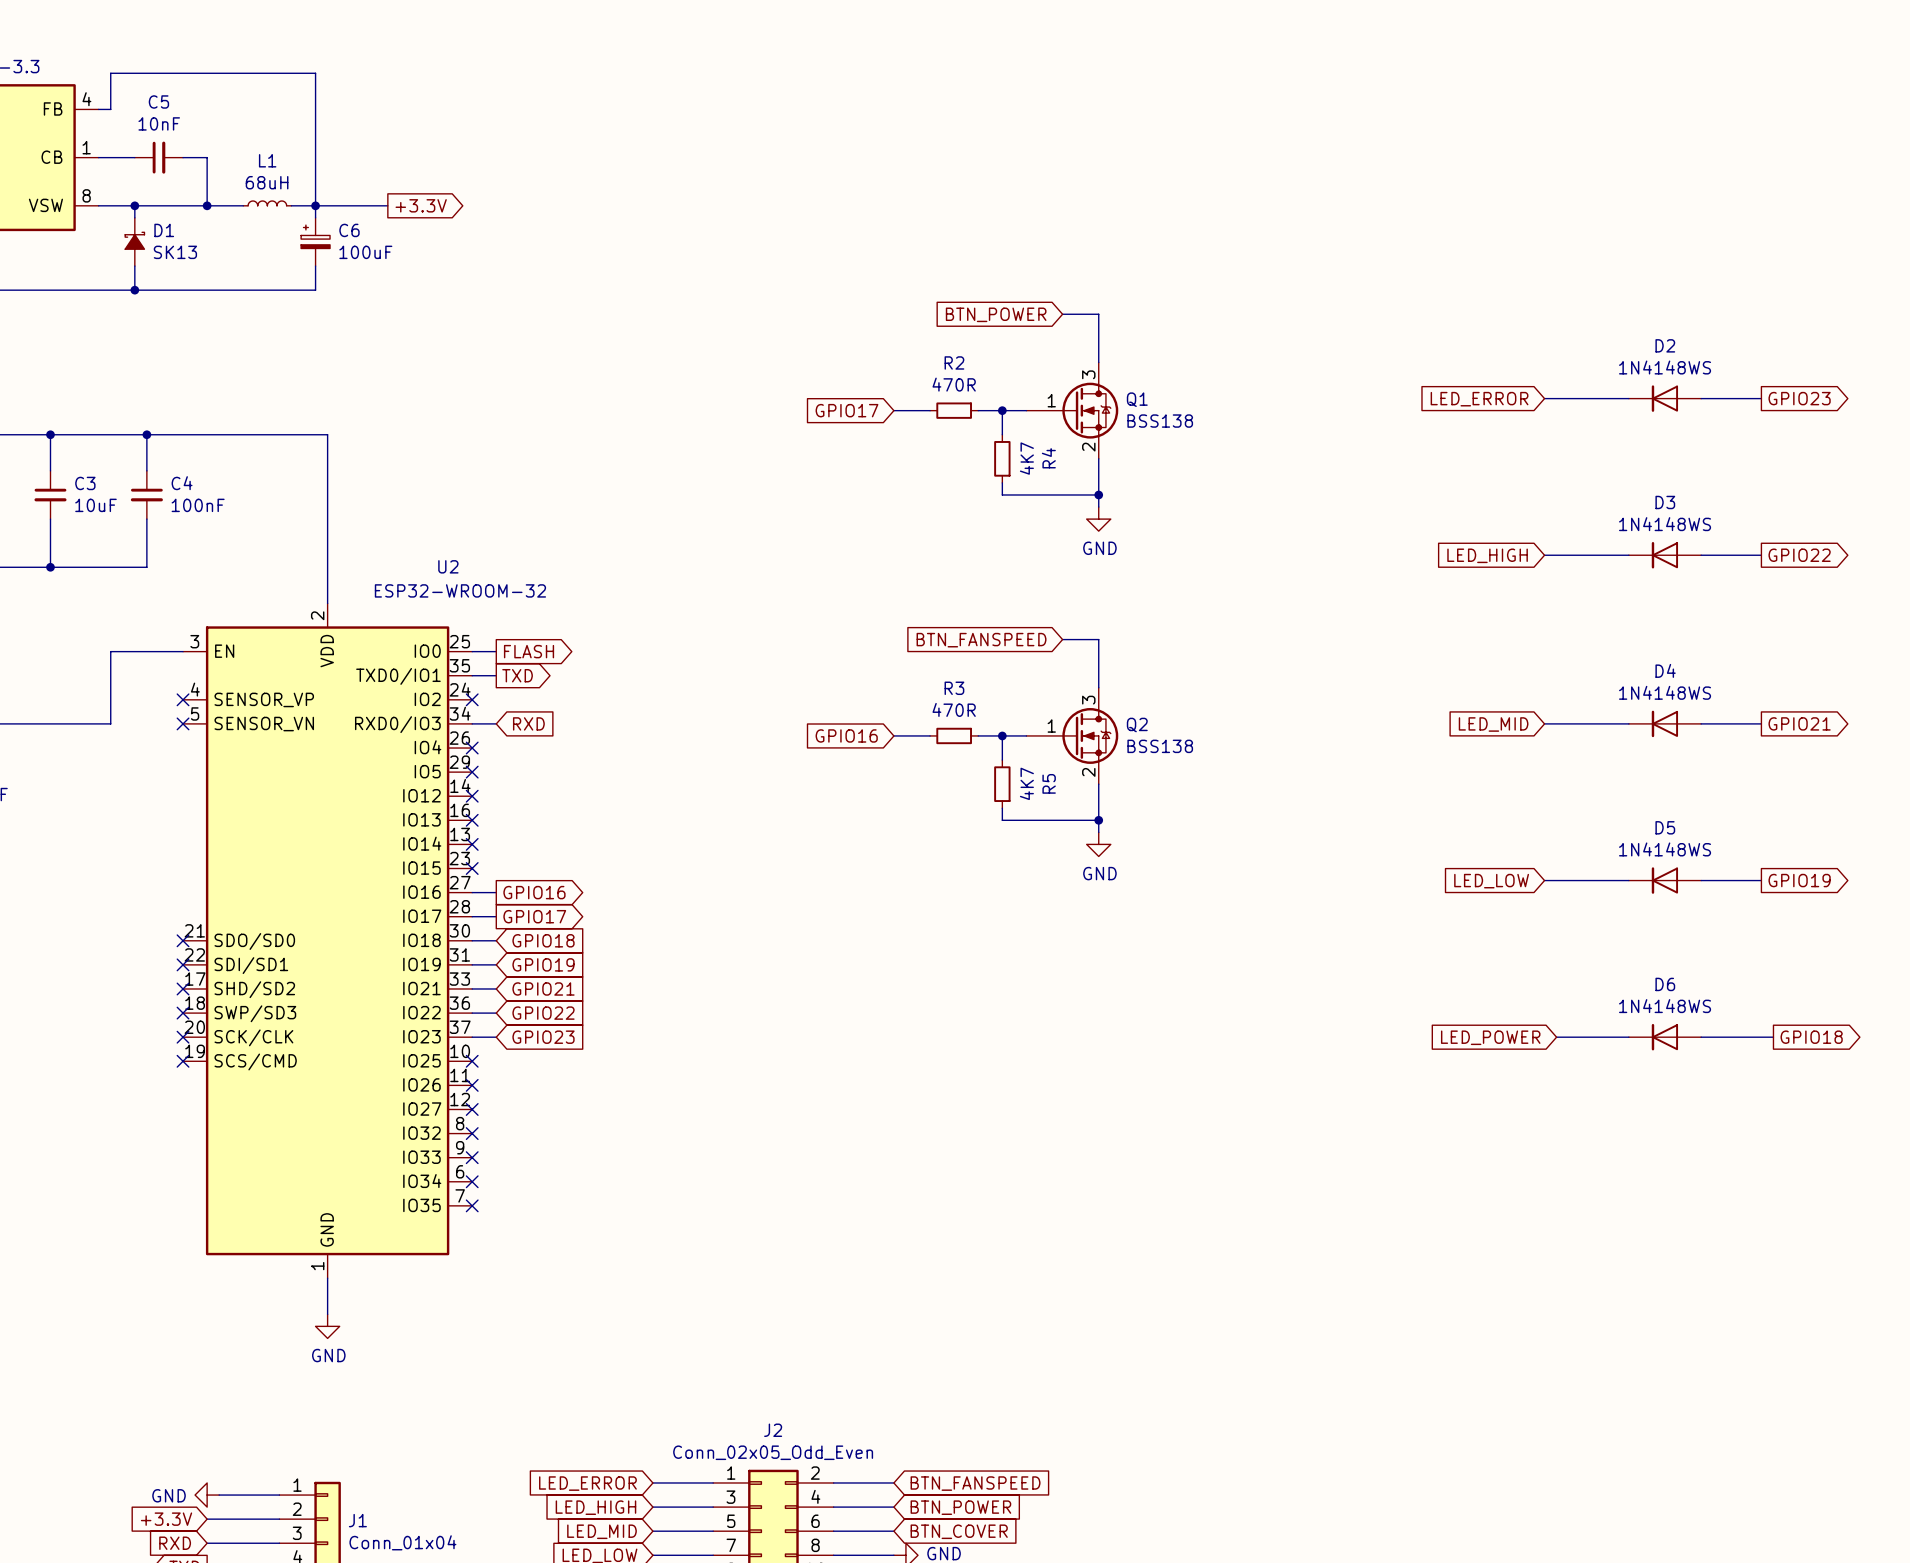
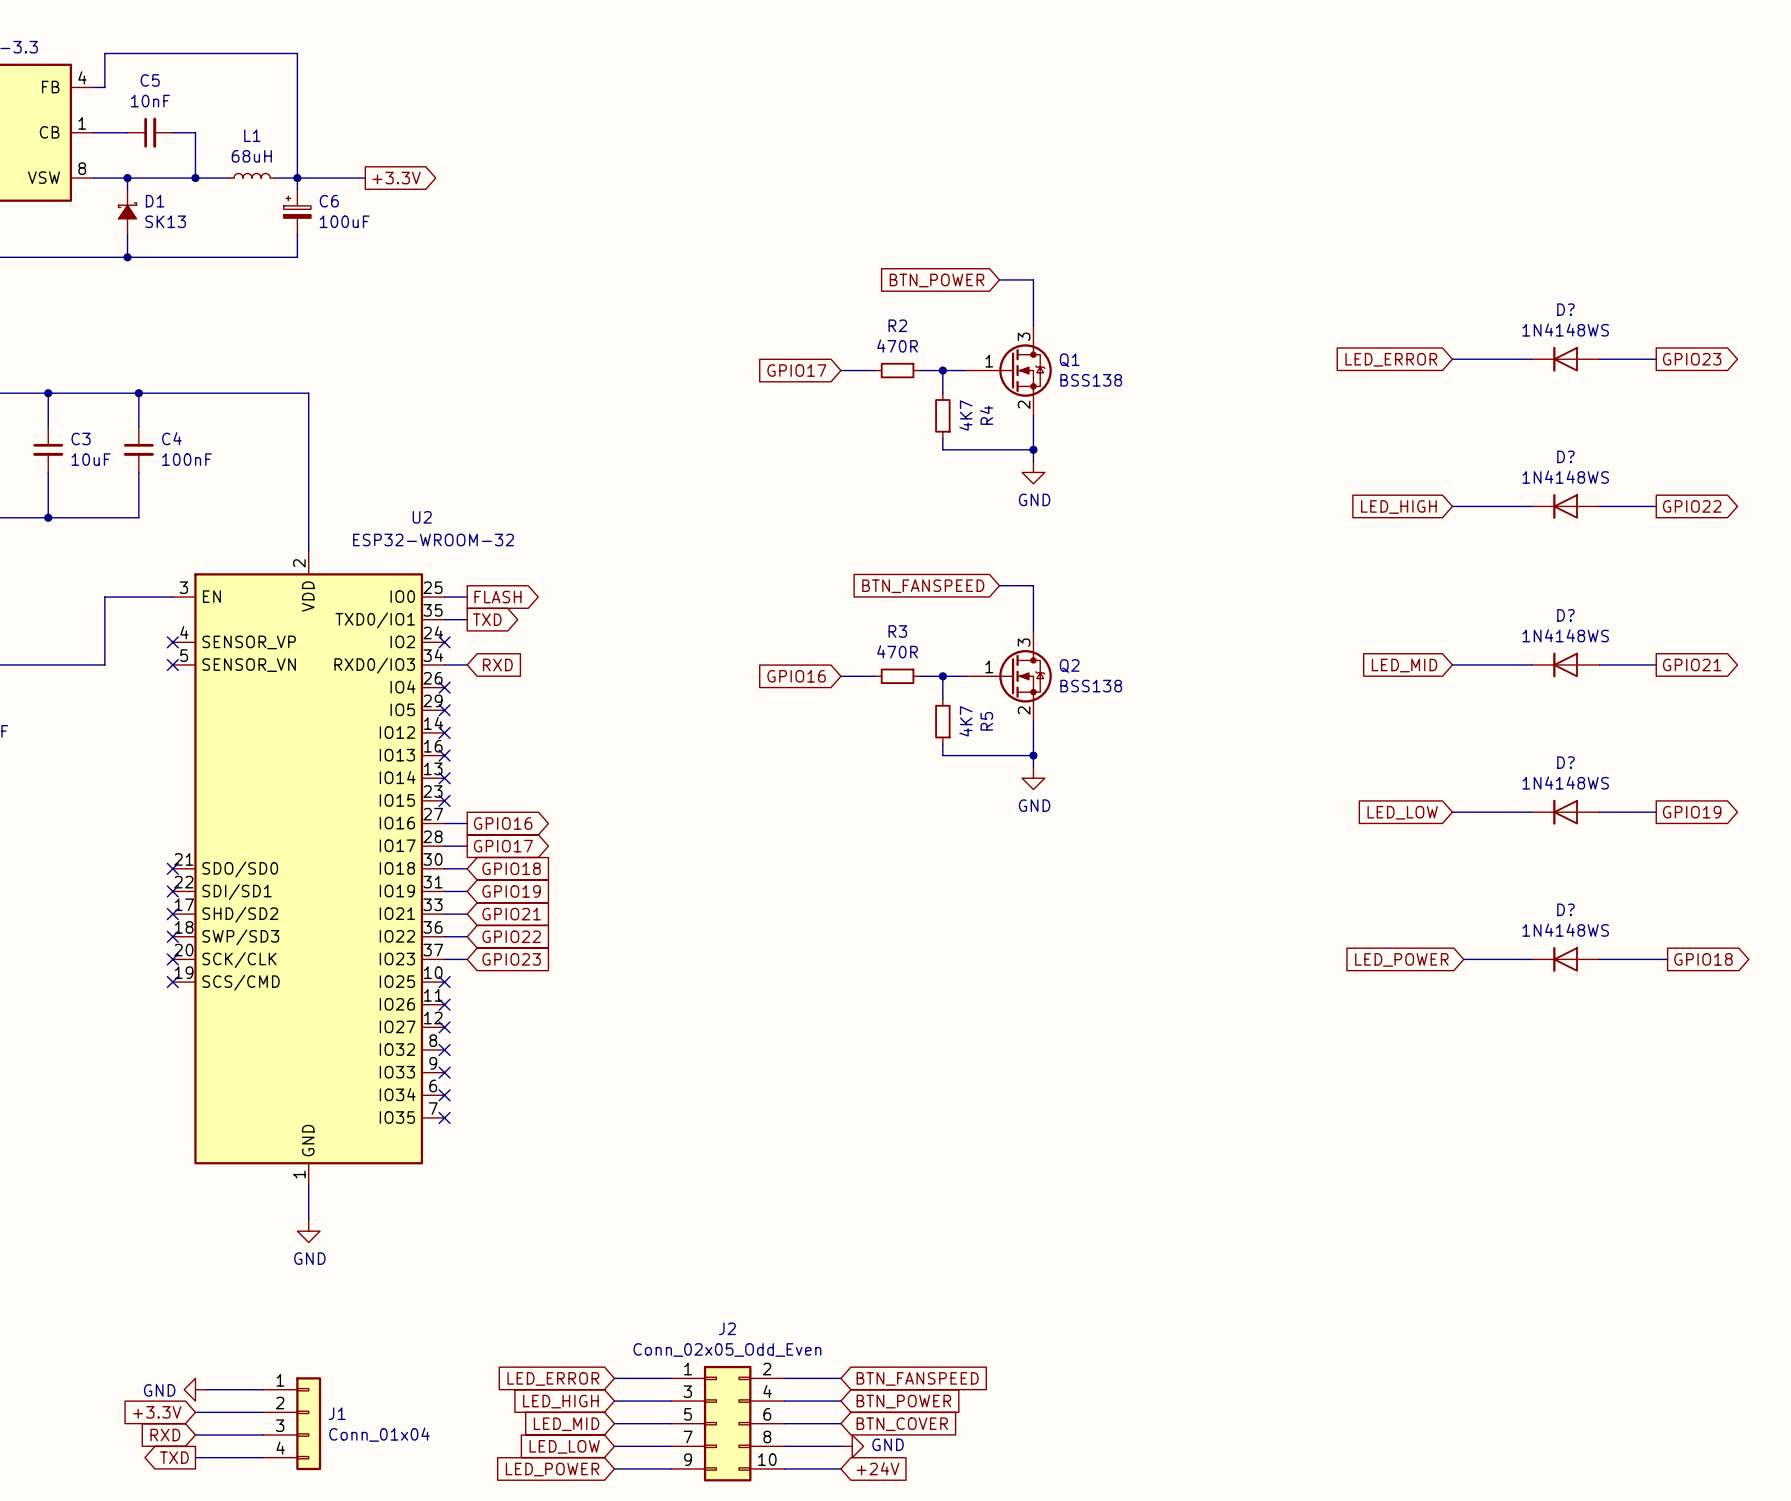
D2 name: D2 (1665, 345) -> D? (1565, 309)
D3 name: D3 (1665, 502) -> D? (1565, 456)
D4 name: D4 (1665, 670) -> D? (1565, 615)
D5 name: D5 (1665, 827) -> D? (1565, 762)
D6 name: D6 (1665, 984) -> D? (1565, 909)

